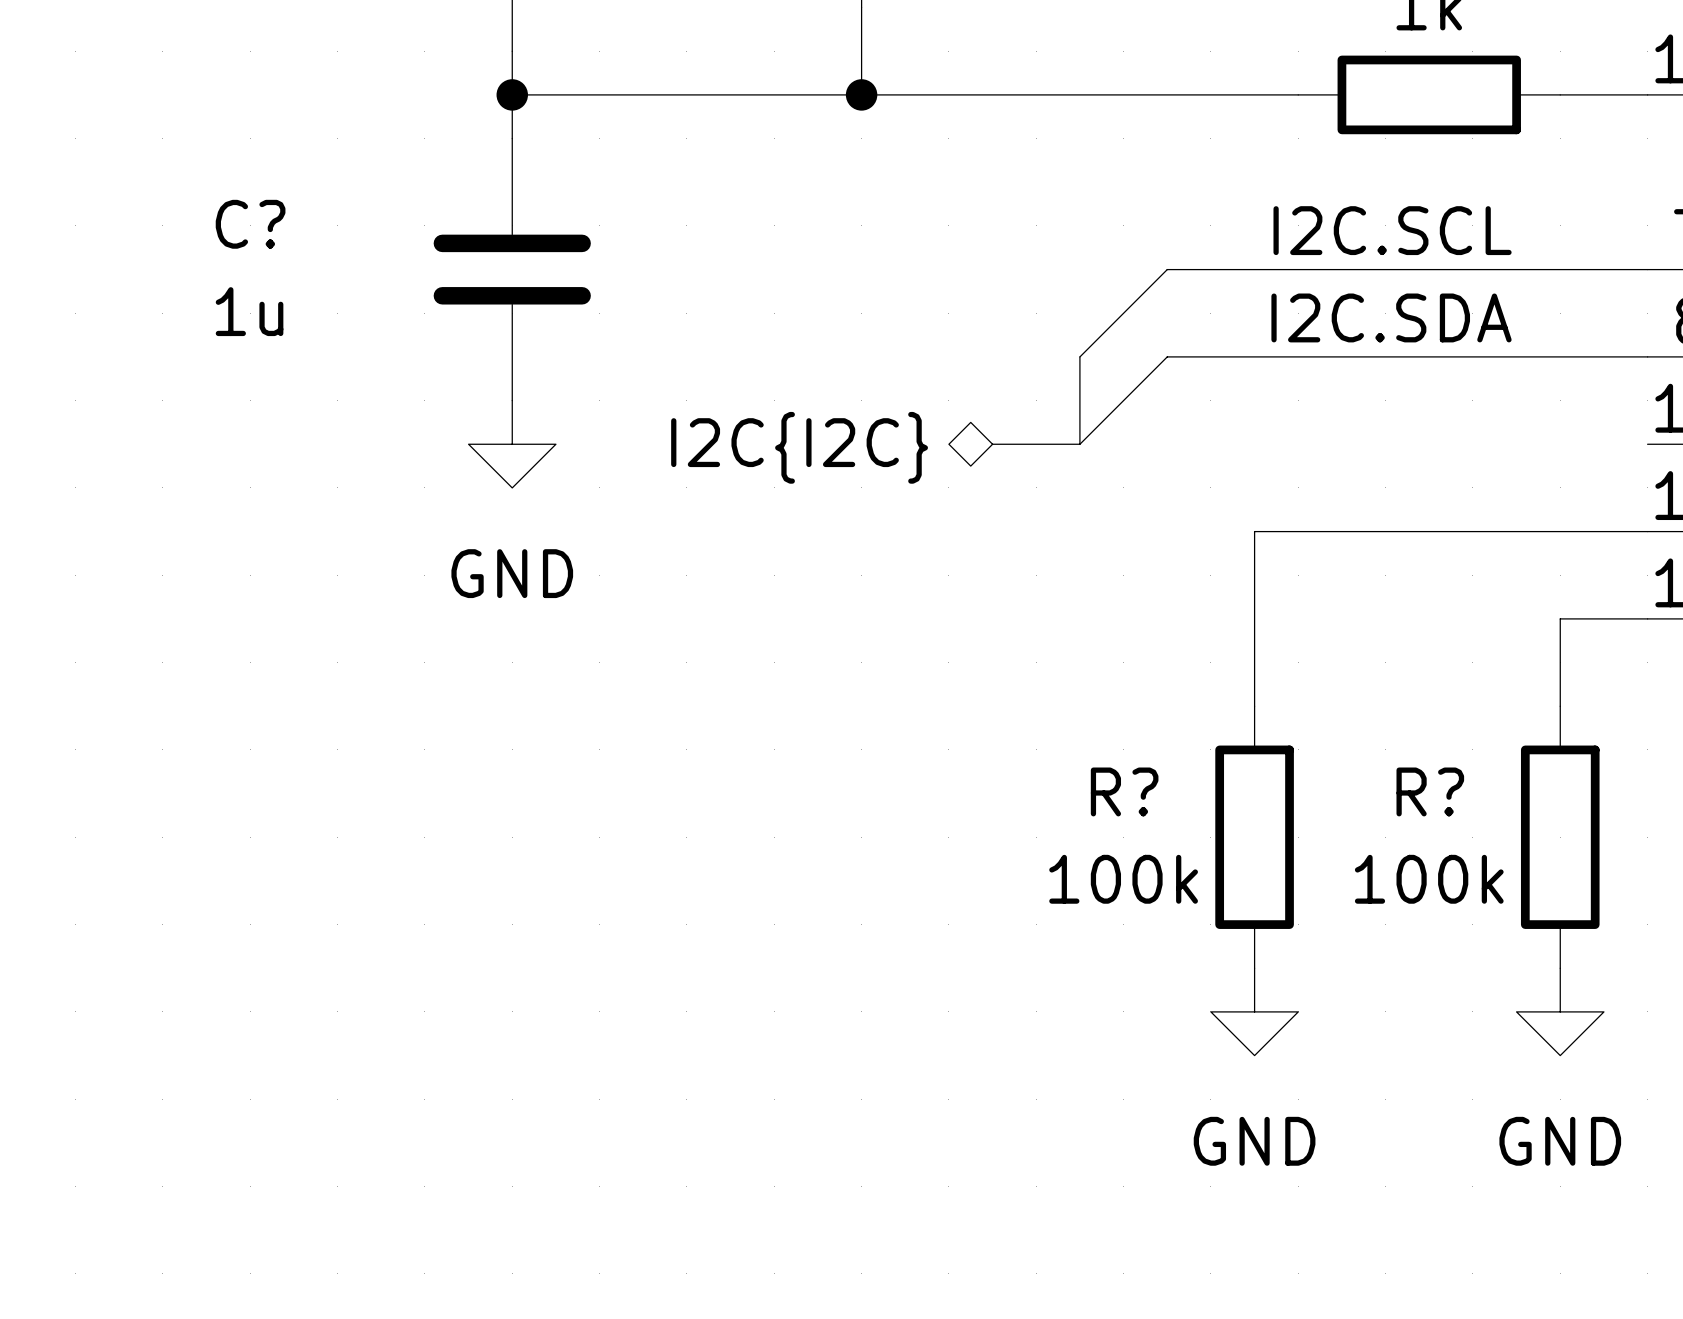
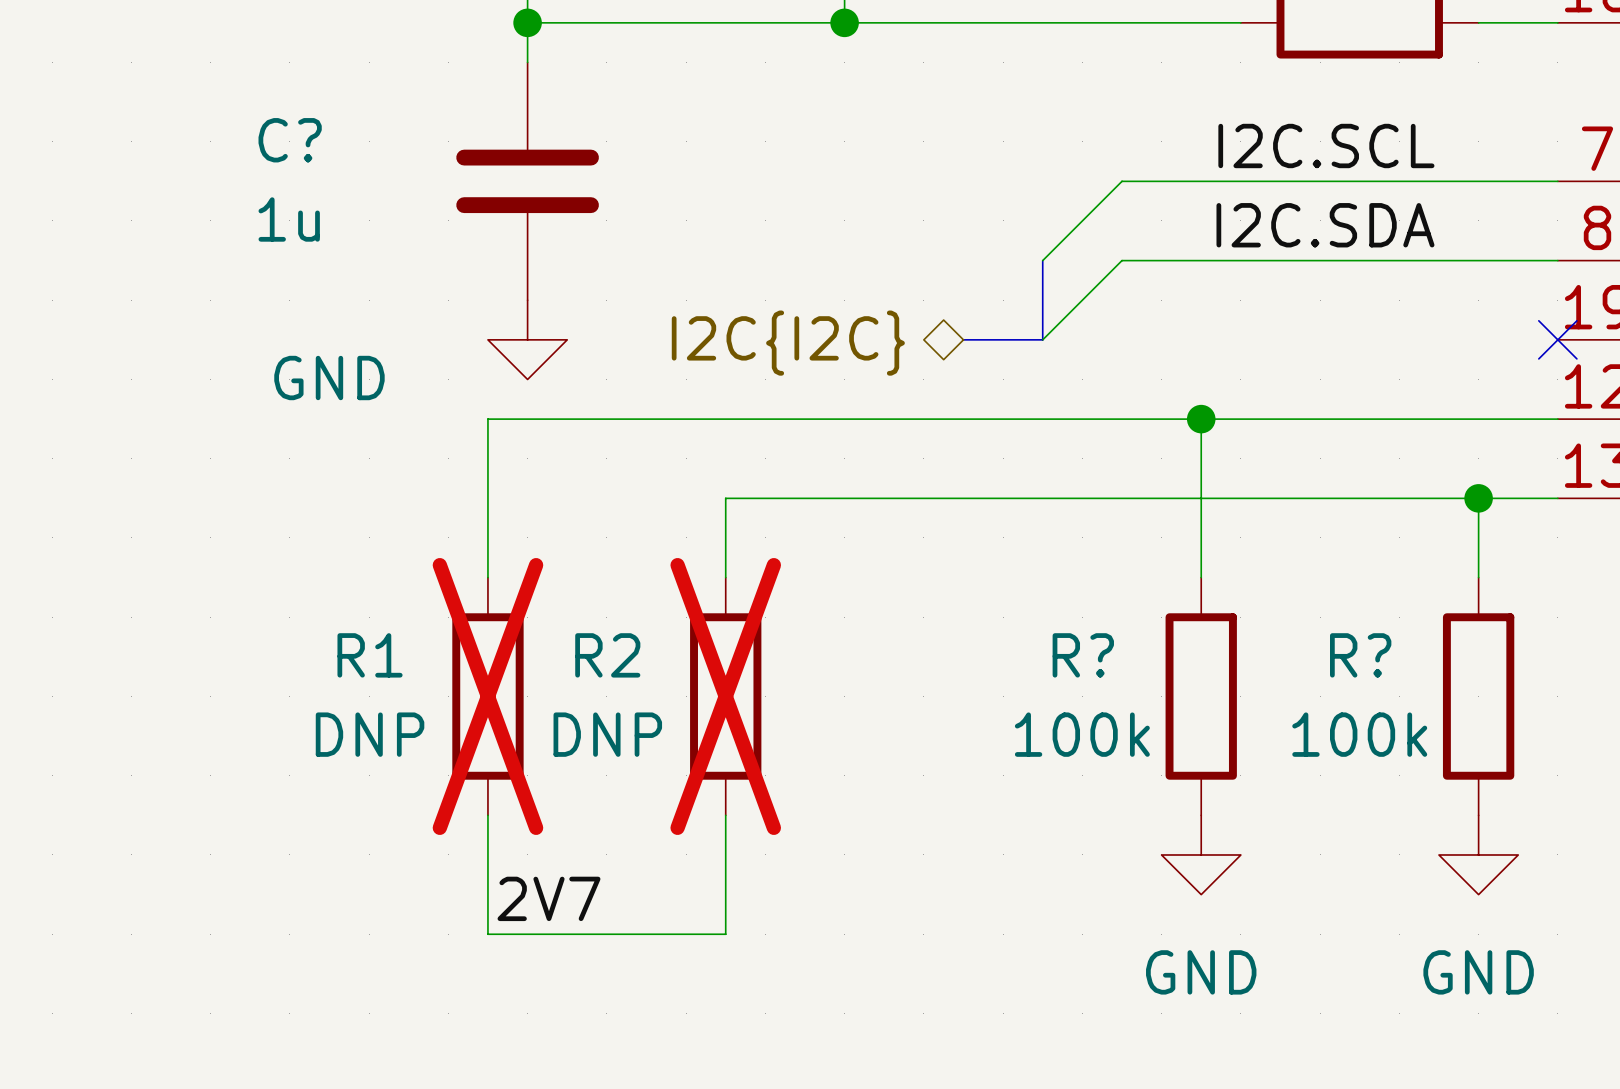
no-connect mark: none -> (1557, 339)
wire: none -> (1201, 419) (487, 419) (487, 577)
junction: none -> (1201, 419)
power symbol text position: GND (512, 573) -> GND (329, 378)
wire: none -> (1478, 498) (725, 498) (725, 577)
junction: none -> (1478, 498)
R1: none -> DNP (487, 696)
R2: none -> DNP (725, 696)
wire: none -> (487, 815) (487, 934) (725, 934) (725, 815)
label: none -> 2V7 (548, 898)

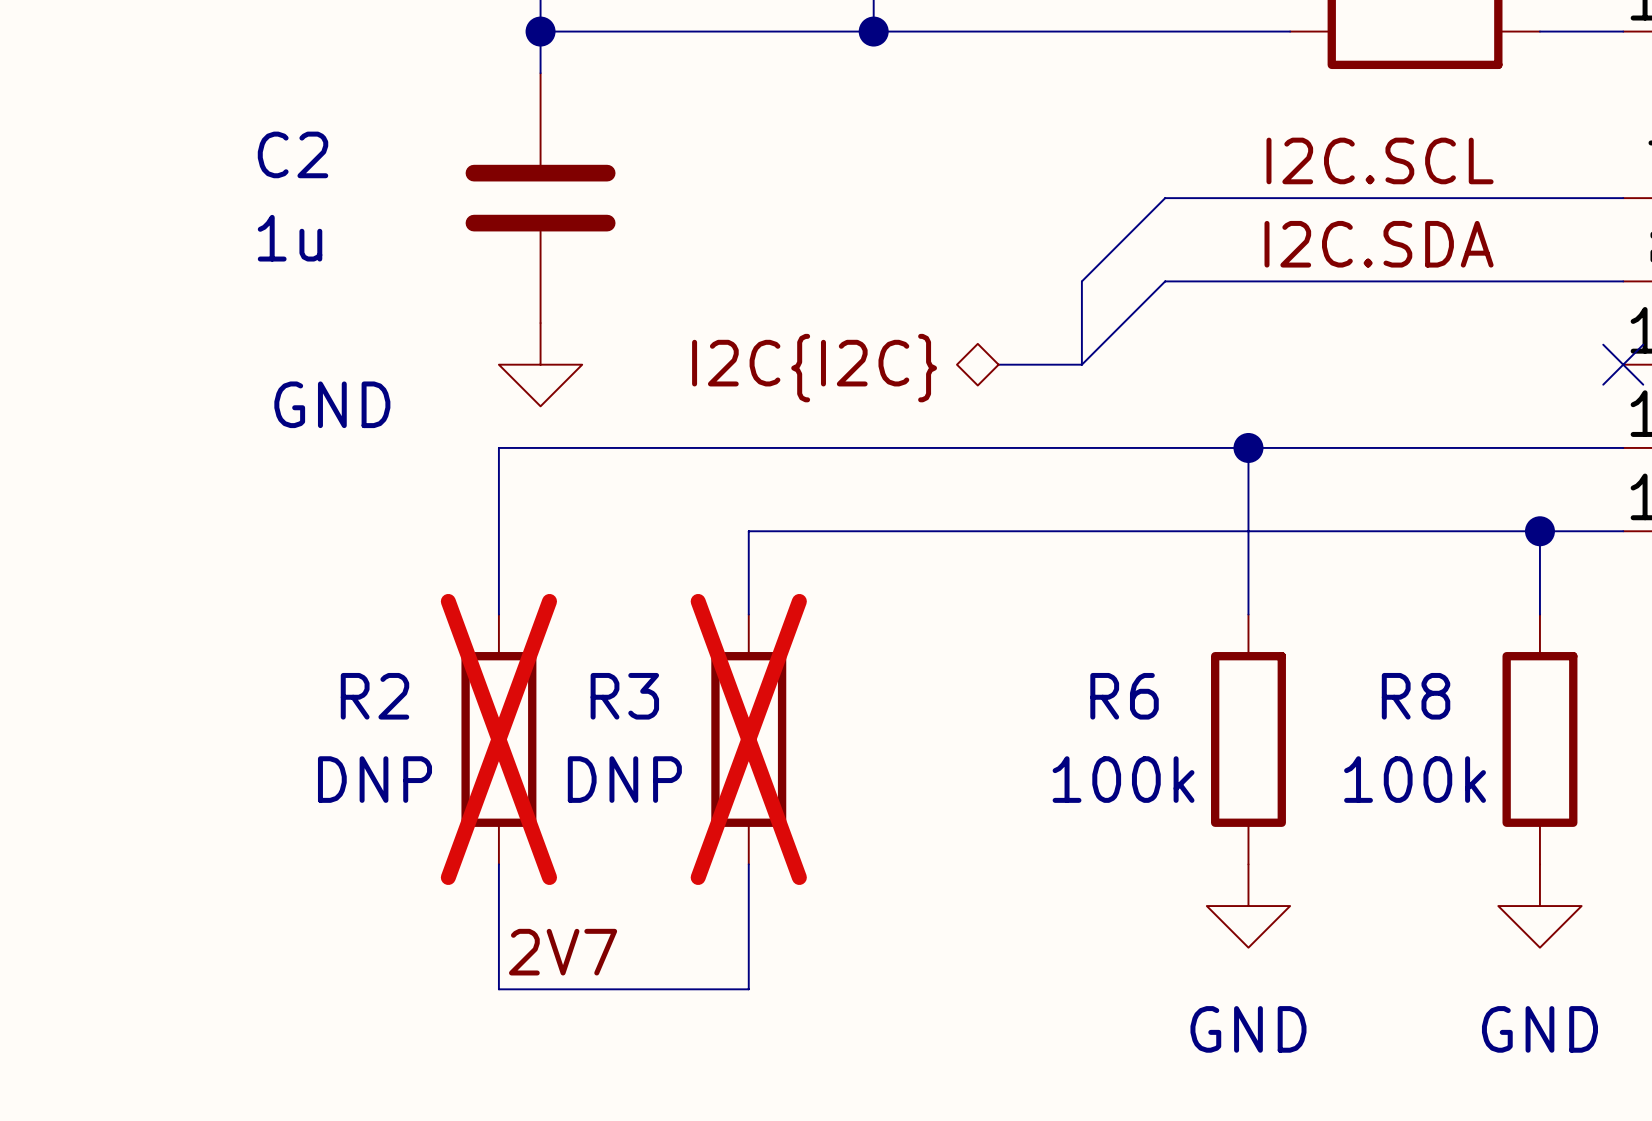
C? name: C? (290, 140) -> C2 (293, 154)
R1 name: R1 (370, 655) -> R2 (374, 696)
R2 name: R2 (607, 655) -> R3 (624, 696)
R? name: R? (1083, 655) -> R6 (1124, 696)
R? name: R? (1360, 655) -> R8 (1416, 696)

